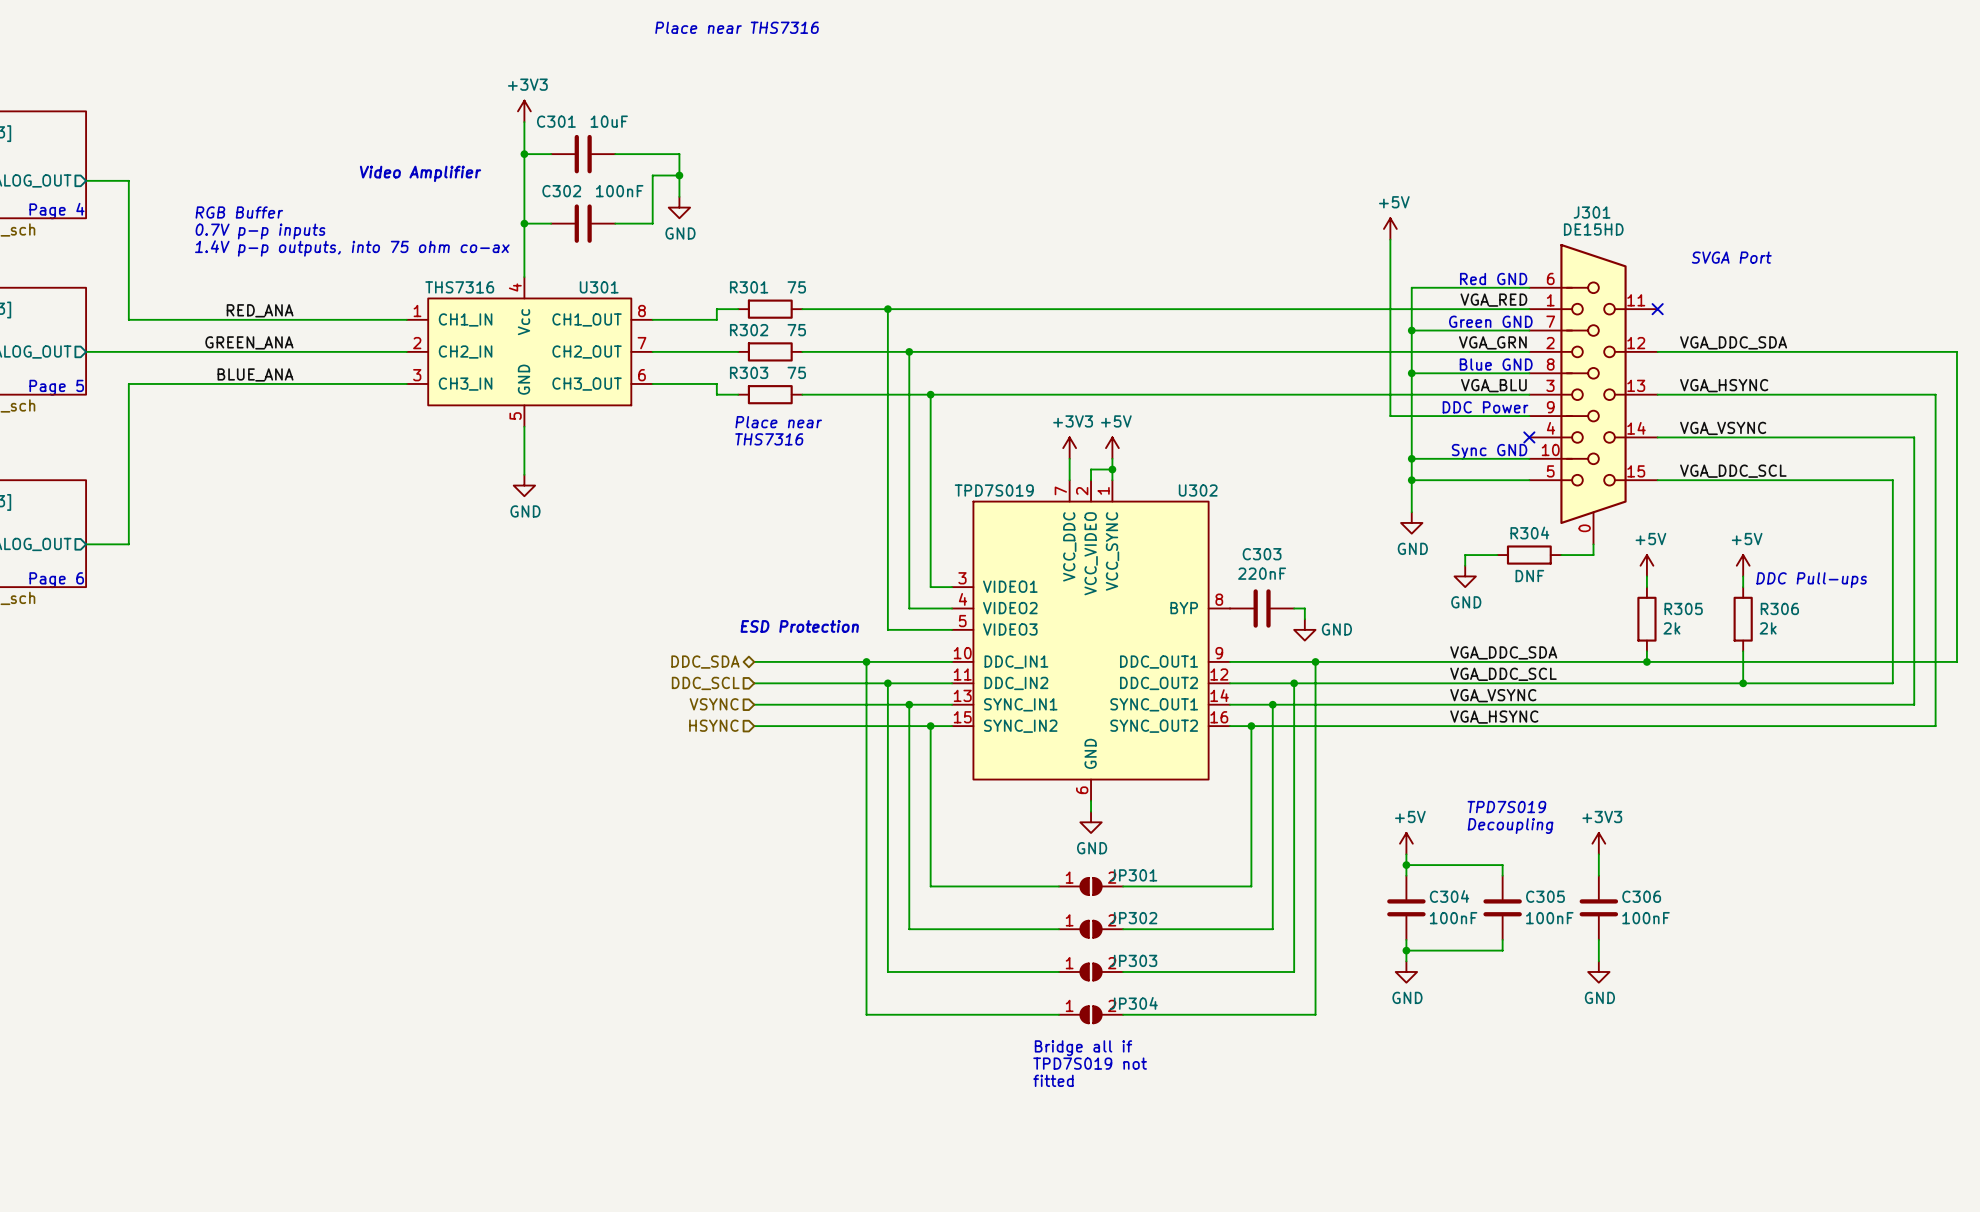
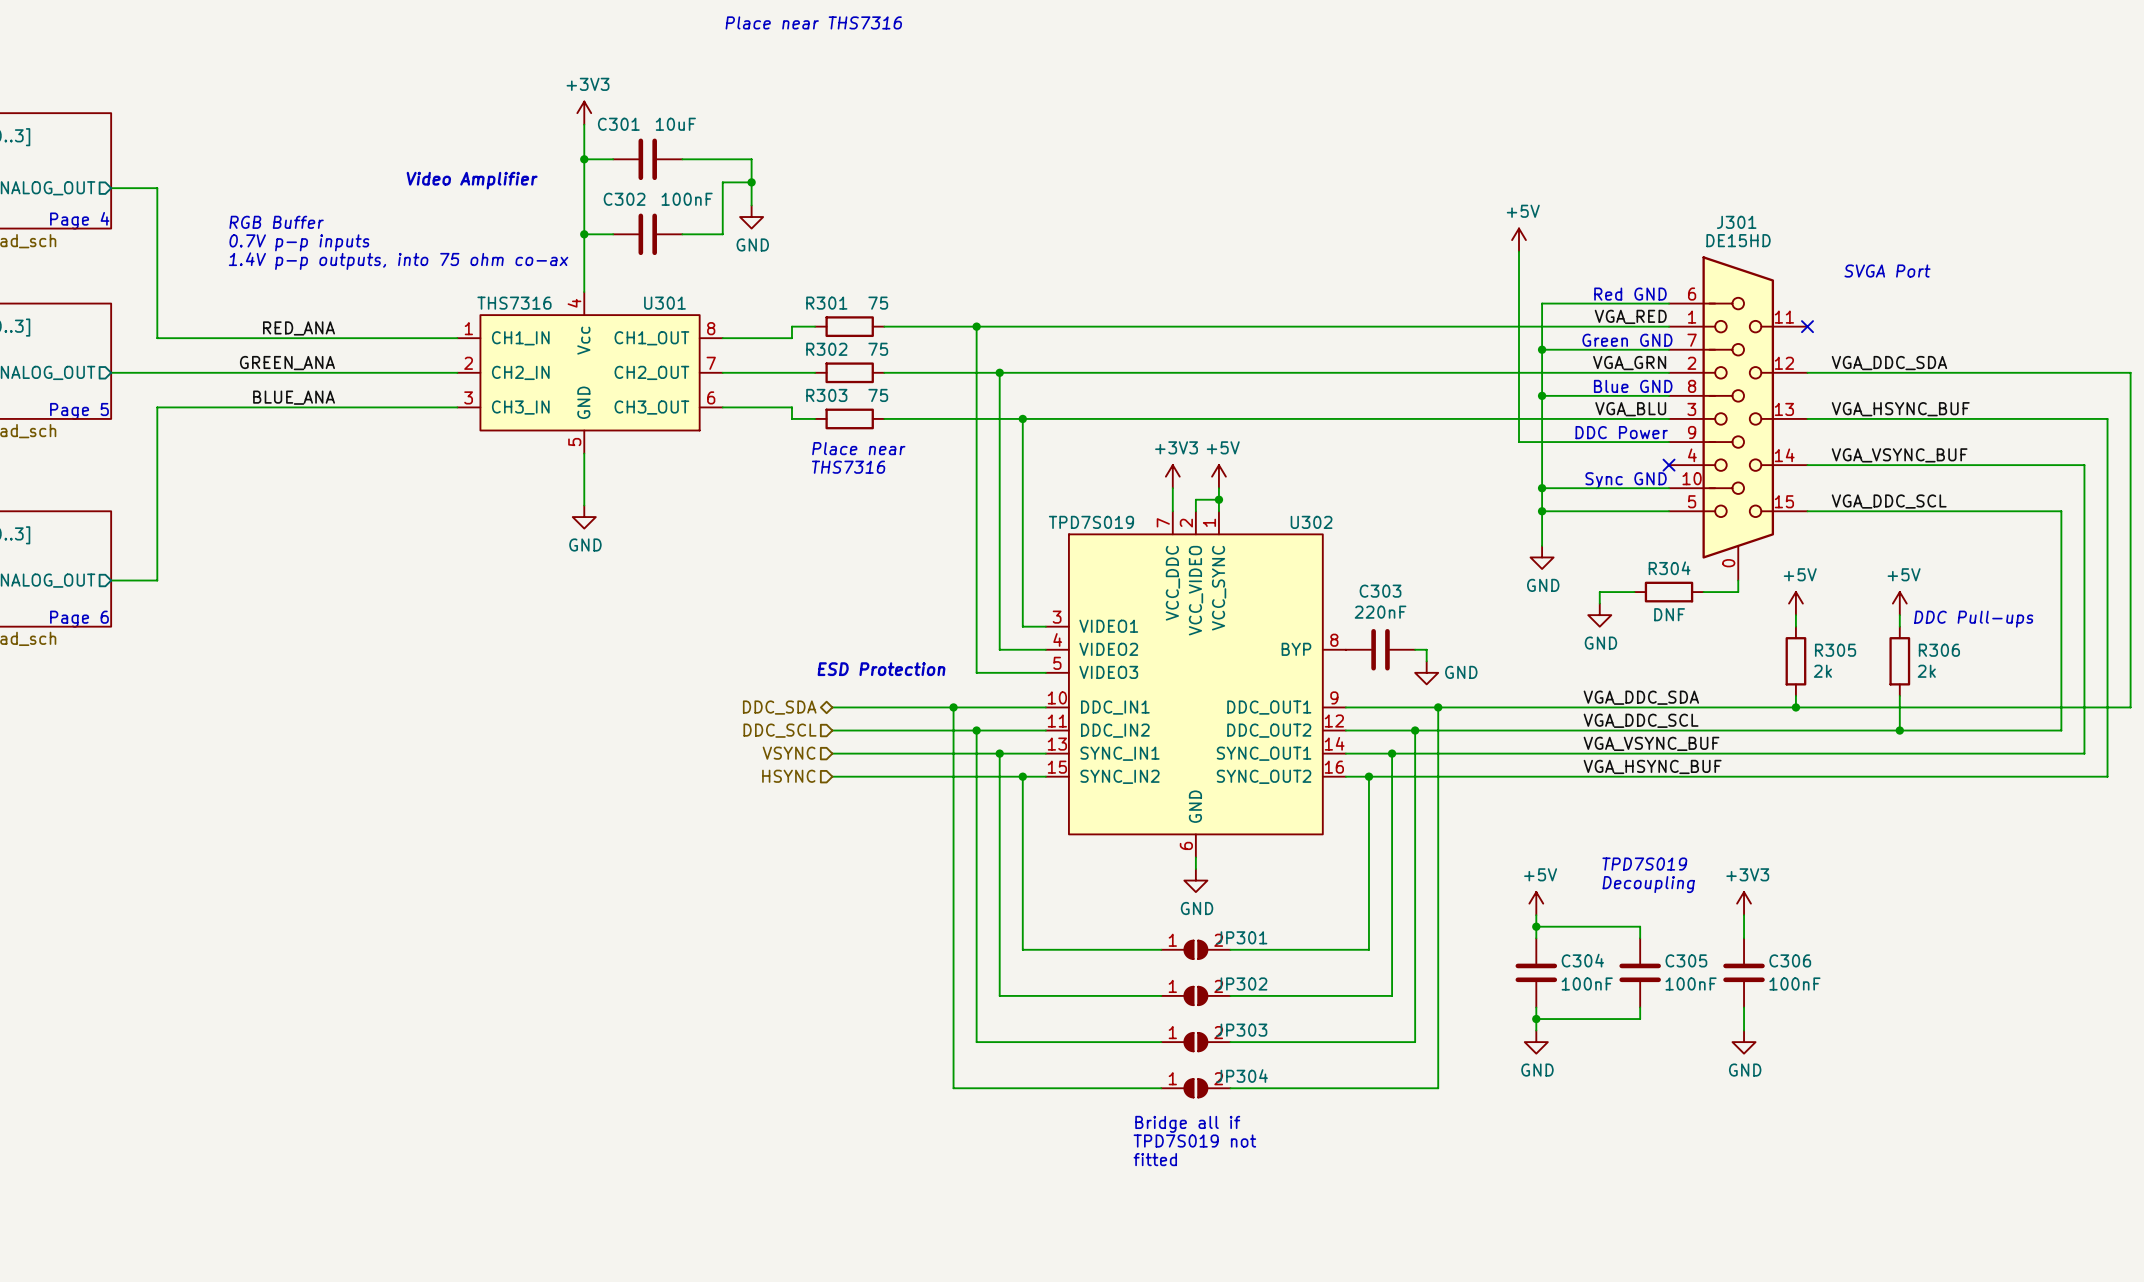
label: VGA_HSYNC (1724, 385) -> VGA_HSYNC_BUF (1900, 409)
label: VGA_VSYNC (1723, 428) -> VGA_VSYNC_BUF (1899, 455)
label: VGA_VSYNC (1493, 695) -> VGA_VSYNC_BUF (1651, 743)
label: VGA_HSYNC (1494, 717) -> VGA_HSYNC_BUF (1652, 766)

